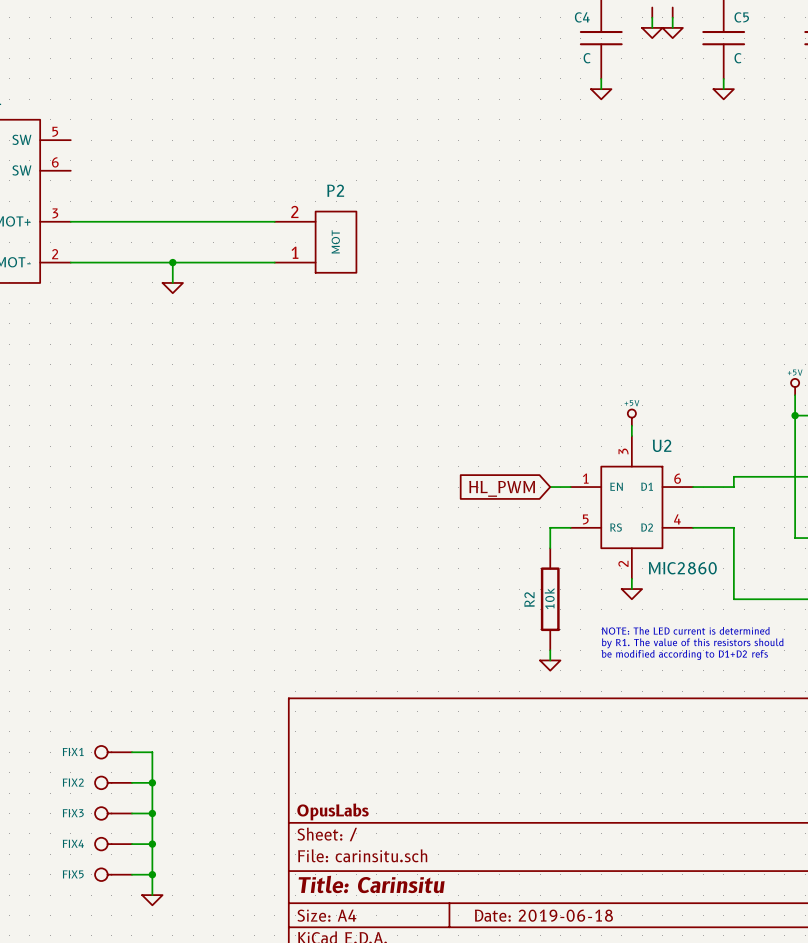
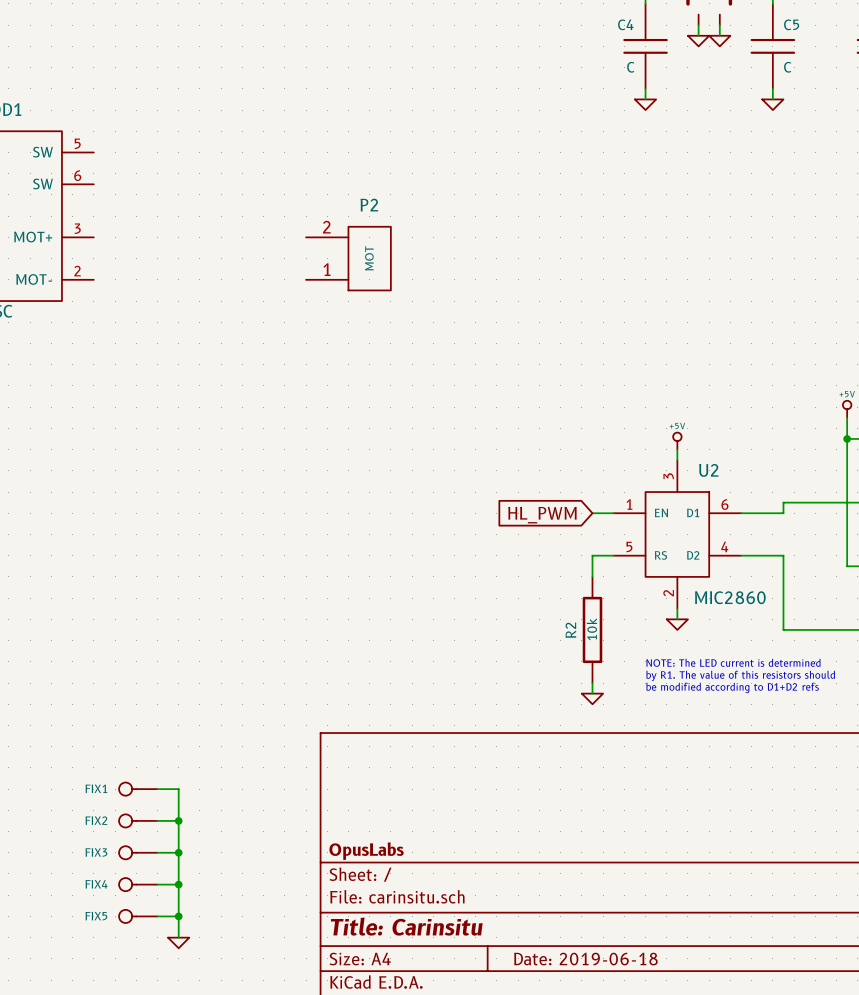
wire: (70, 221) (274, 221) -> none
wire: (70, 262) (274, 262) -> none
wire: (172, 262) (172, 282) -> none
junction: (172, 262) -> none
power symbol: (172, 288) -> none

